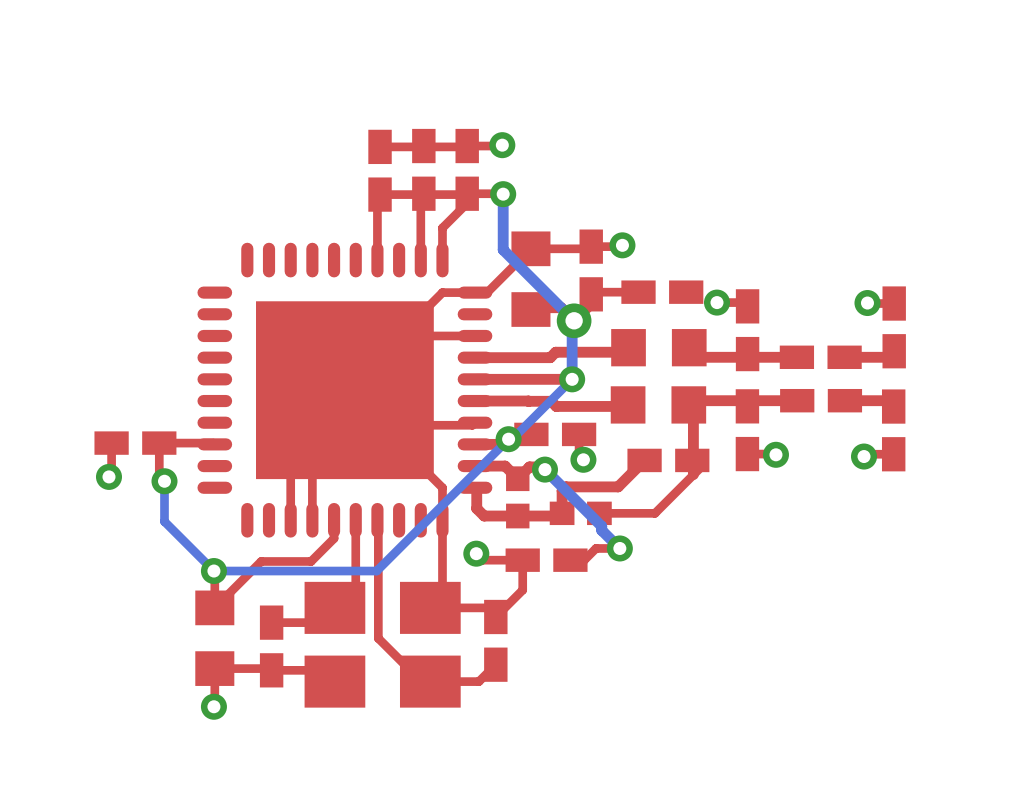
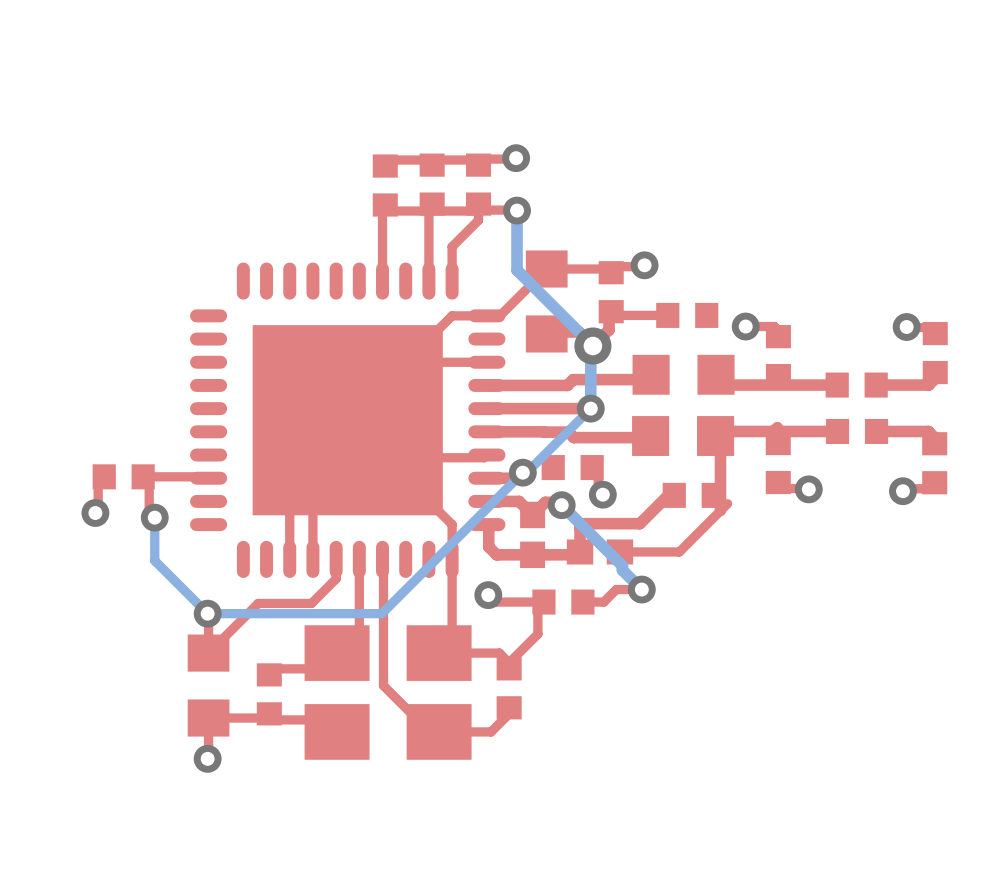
part footprint: [412, 128, 436, 211] -> [419, 153, 445, 216]
part footprint: [455, 128, 479, 211] -> [466, 153, 492, 216]
part footprint: [368, 129, 392, 212] -> [372, 154, 398, 217]
part footprint: [579, 229, 603, 312] -> [598, 261, 624, 324]
part footprint: [621, 280, 704, 304] -> [656, 302, 719, 328]
part footprint: [882, 286, 906, 369] -> [922, 321, 948, 385]
part footprint: [735, 289, 760, 372] -> [765, 325, 791, 388]
part footprint: [779, 345, 862, 370] -> [825, 372, 888, 398]
part footprint: [780, 388, 863, 413] -> [825, 418, 889, 445]
part footprint: [735, 389, 760, 472] -> [765, 431, 791, 495]
part footprint: [881, 389, 906, 472] -> [922, 432, 948, 495]
part footprint: [514, 422, 597, 447] -> [541, 455, 604, 481]
part footprint: [94, 431, 177, 455] -> [92, 464, 155, 490]
part footprint: [627, 448, 710, 473] -> [662, 482, 725, 508]
part footprint: [505, 548, 588, 572] -> [532, 589, 595, 615]
part footprint: [484, 599, 508, 682] -> [496, 657, 522, 720]
part footprint: [259, 605, 284, 688] -> [256, 663, 282, 726]

